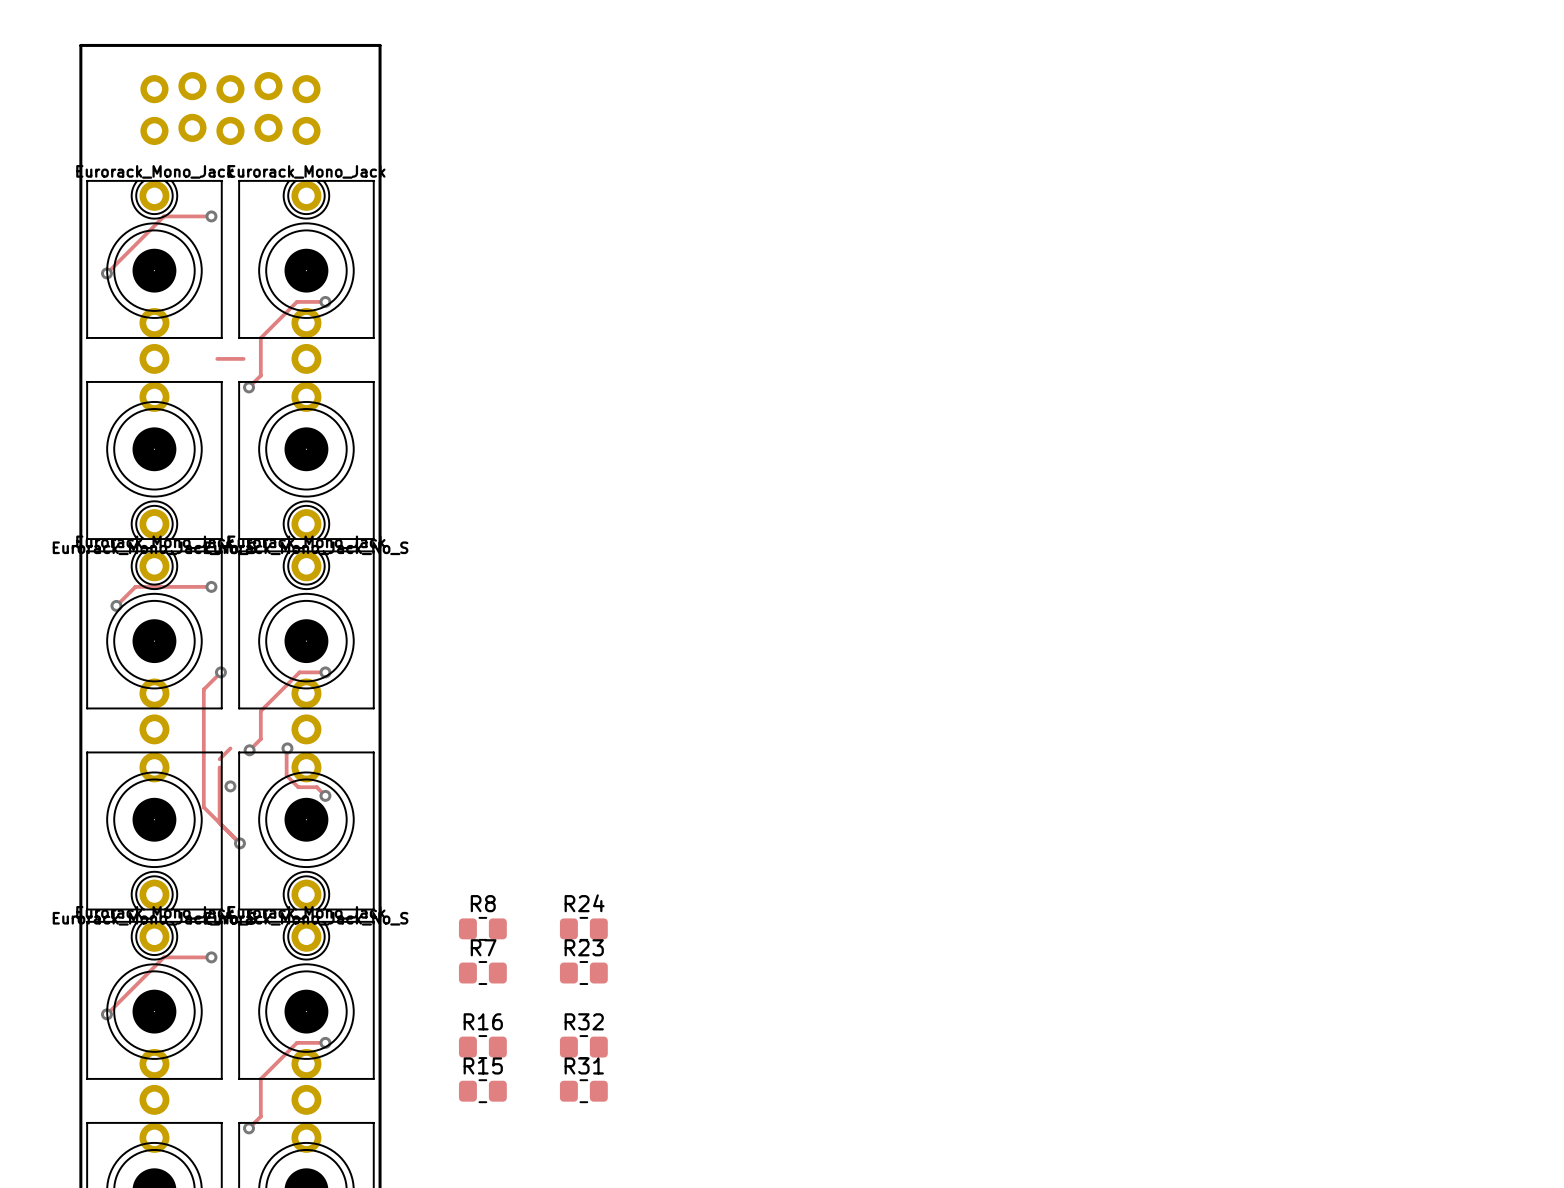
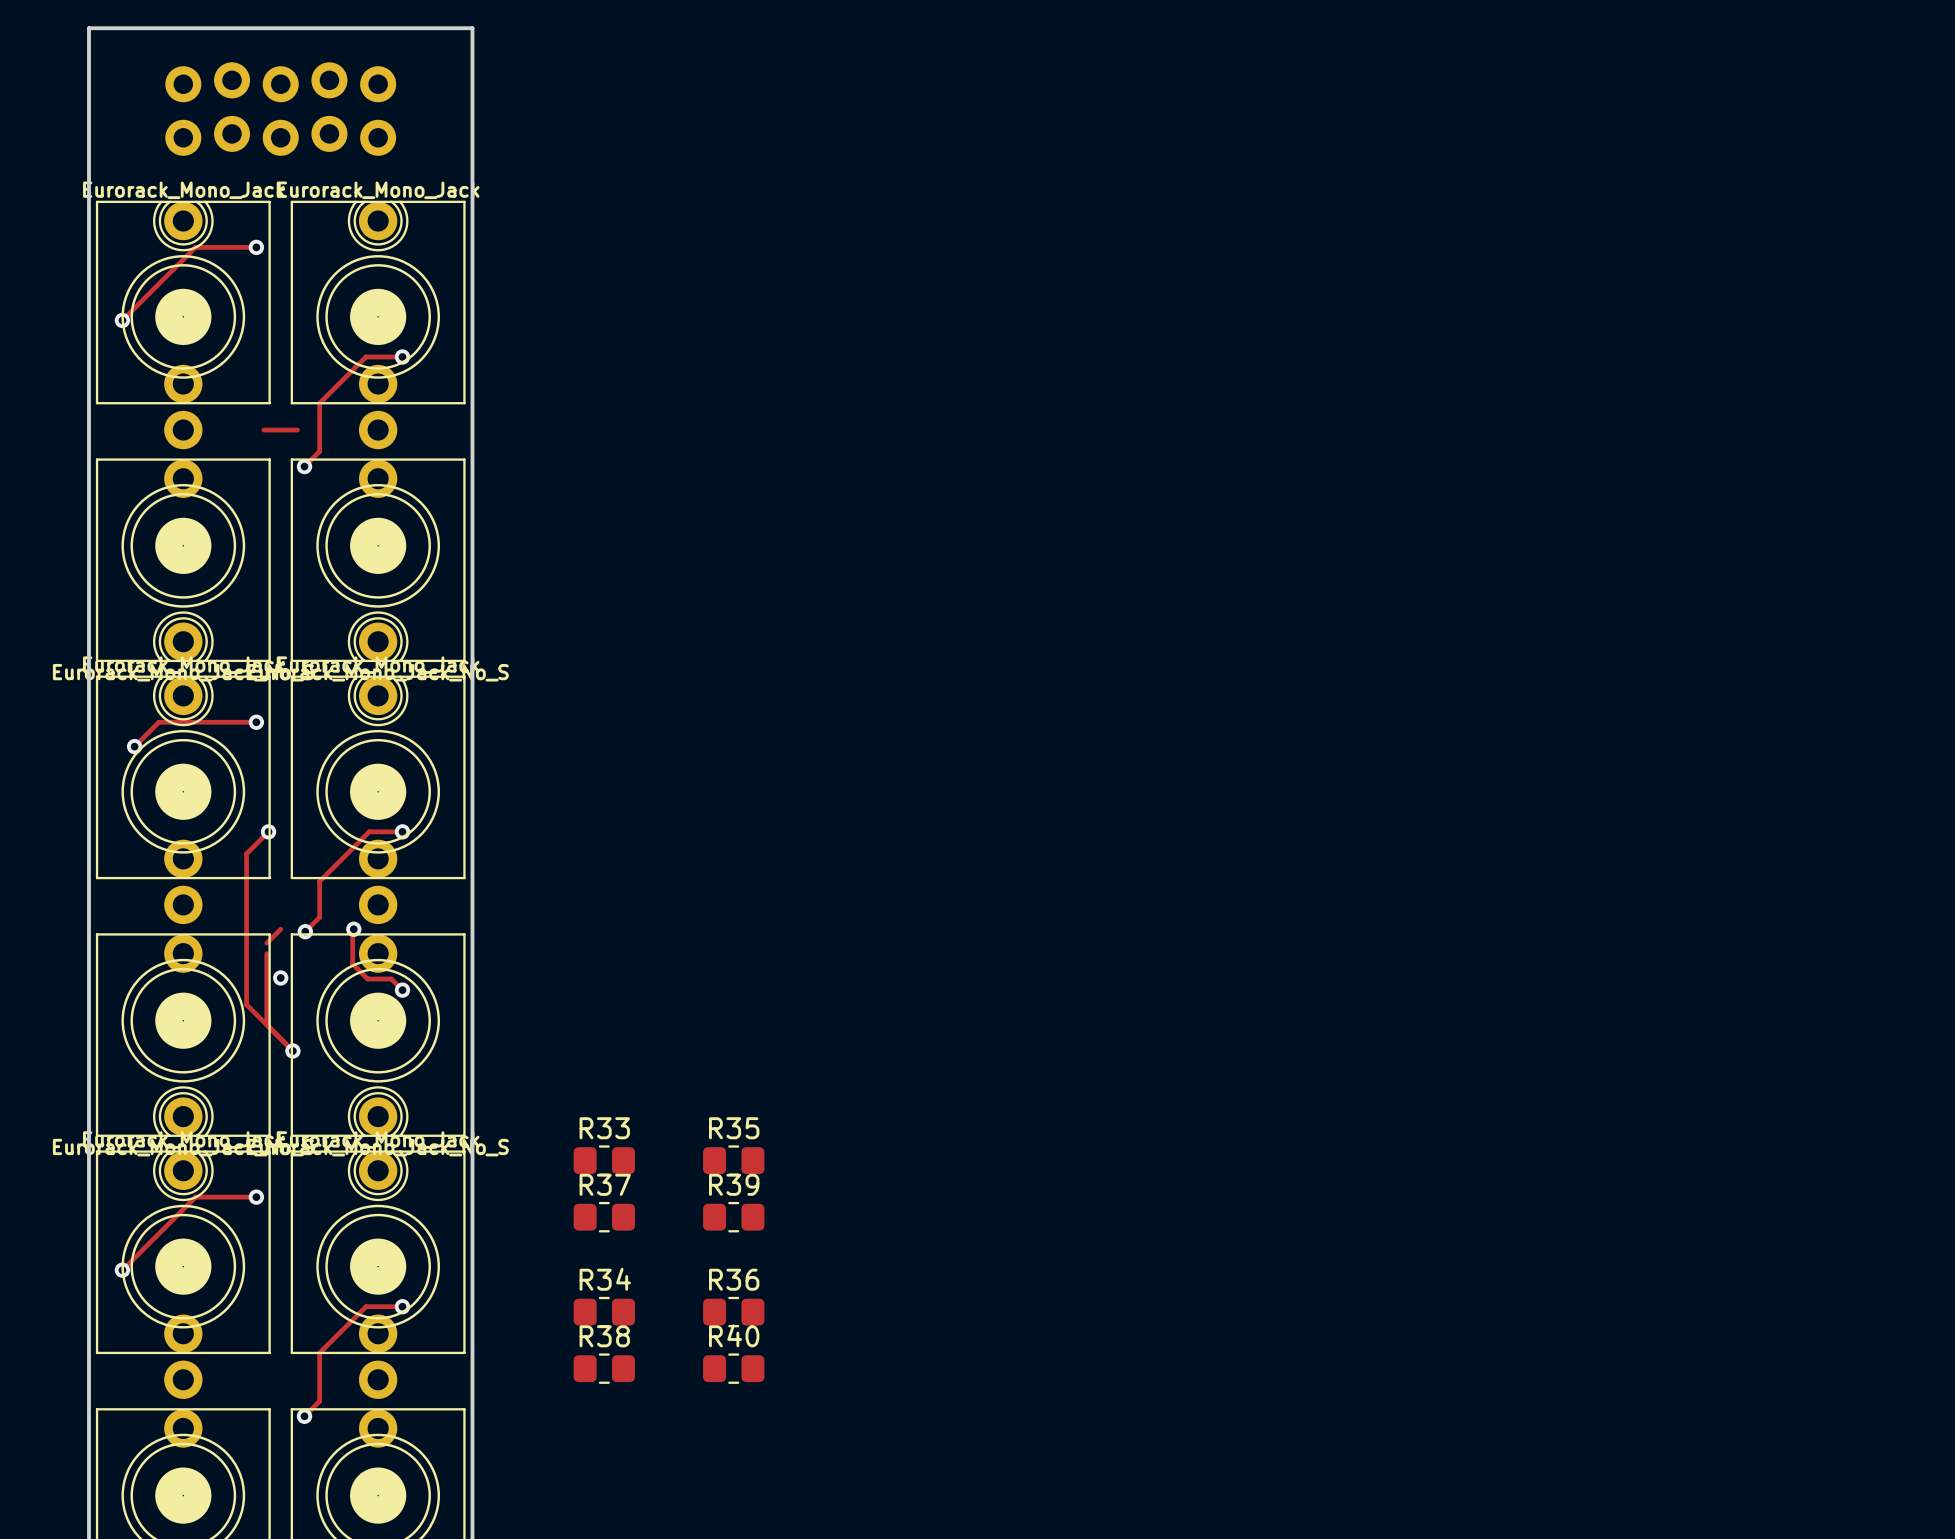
R8 name: R8 (483, 903) -> R33 (604, 1128)
R24 name: R24 (584, 903) -> R35 (734, 1128)
R7 name: R7 (483, 947) -> R37 (605, 1184)
R23 name: R23 (584, 947) -> R39 (734, 1184)
R16 name: R16 (483, 1021) -> R34 (605, 1279)
R32 name: R32 (584, 1021) -> R36 (734, 1279)
R15 name: R15 (483, 1065) -> R38 (604, 1336)
R31 name: R31 (584, 1065) -> R40 (734, 1335)

